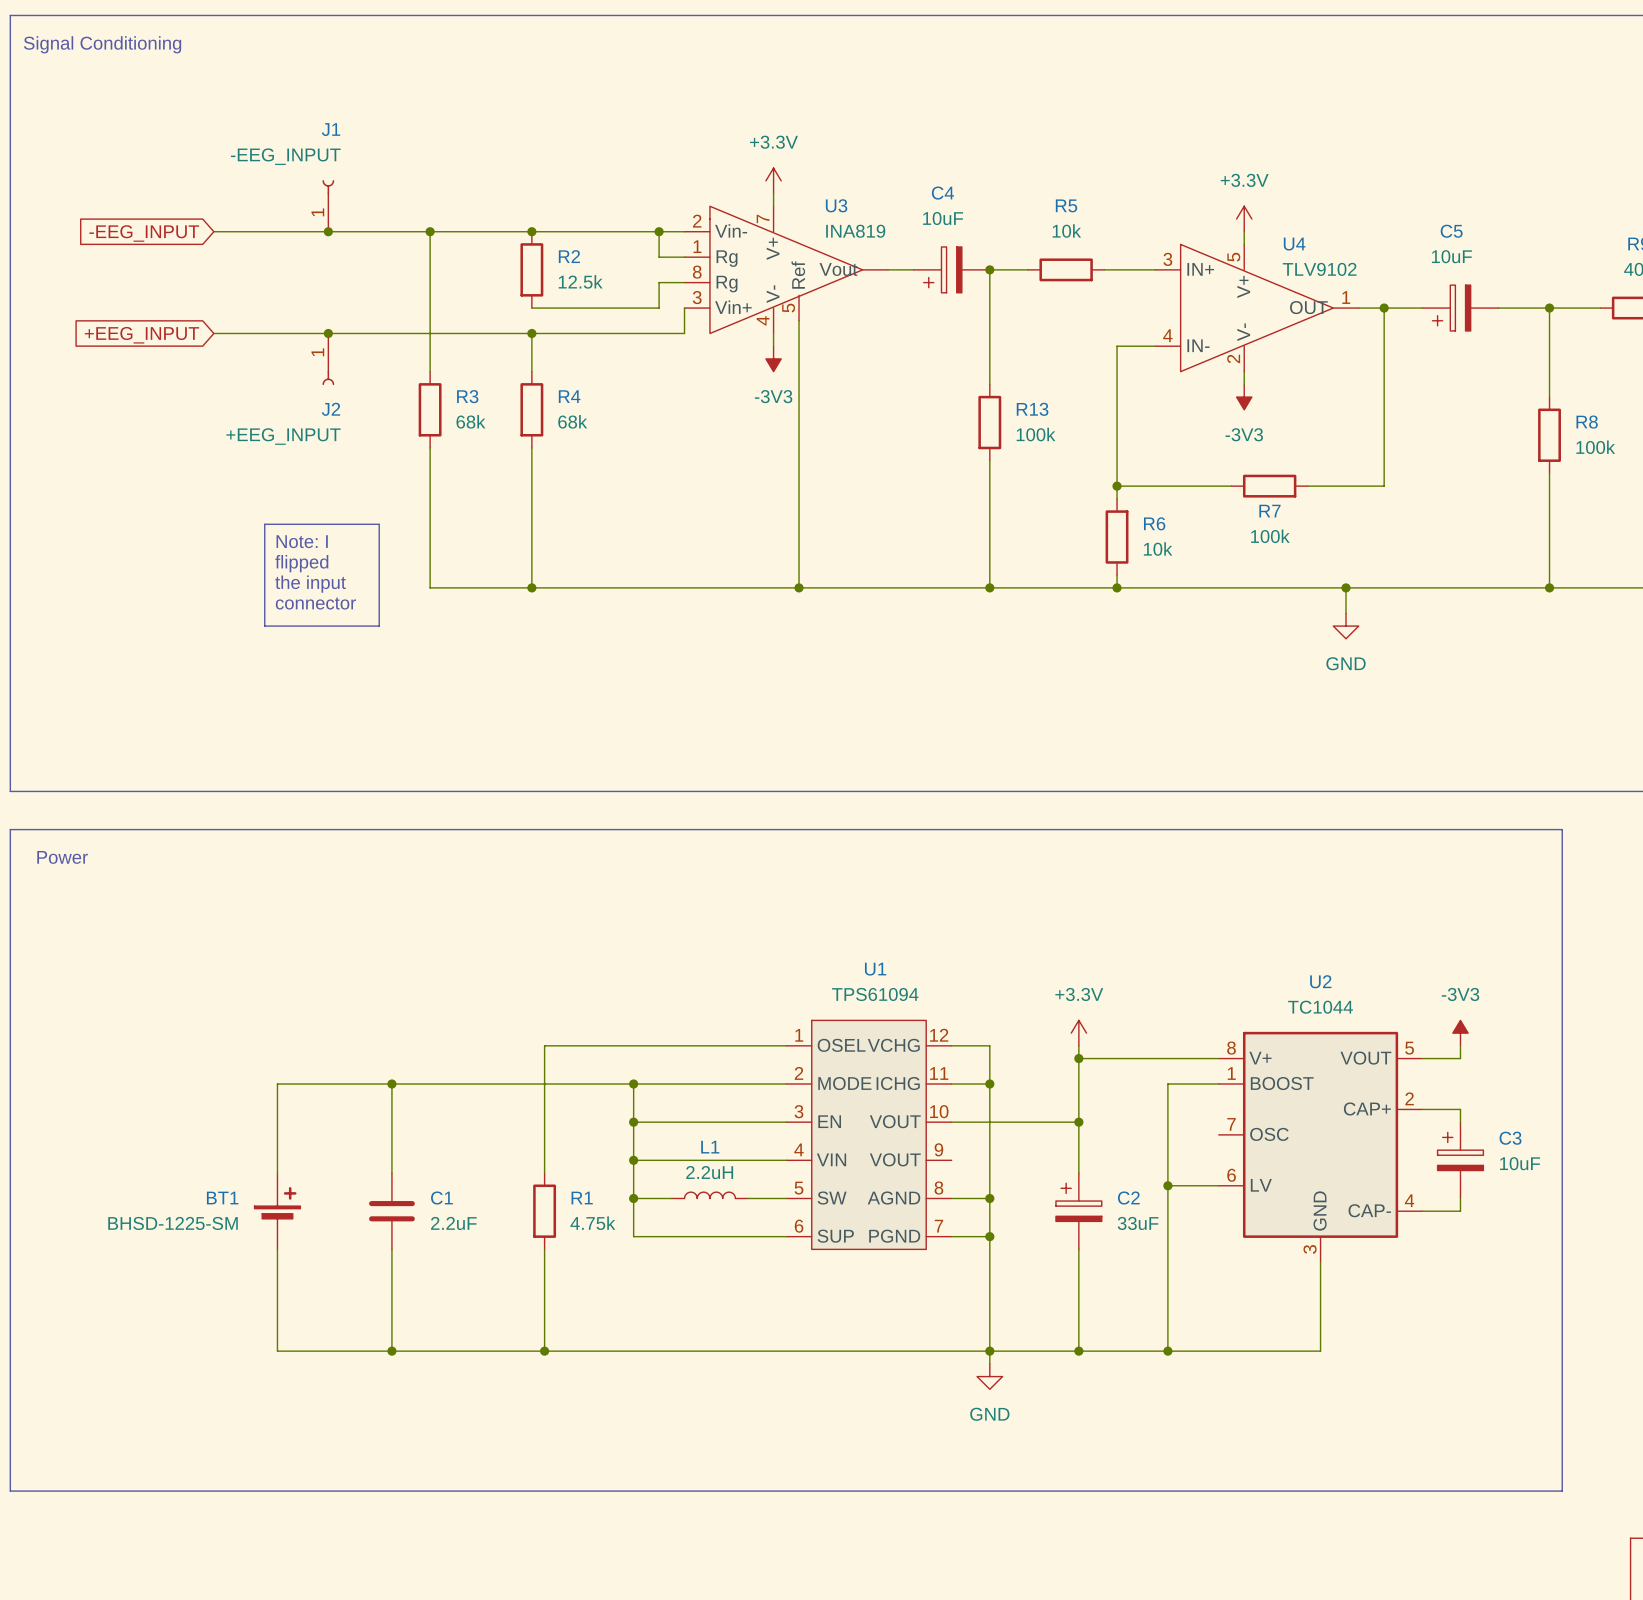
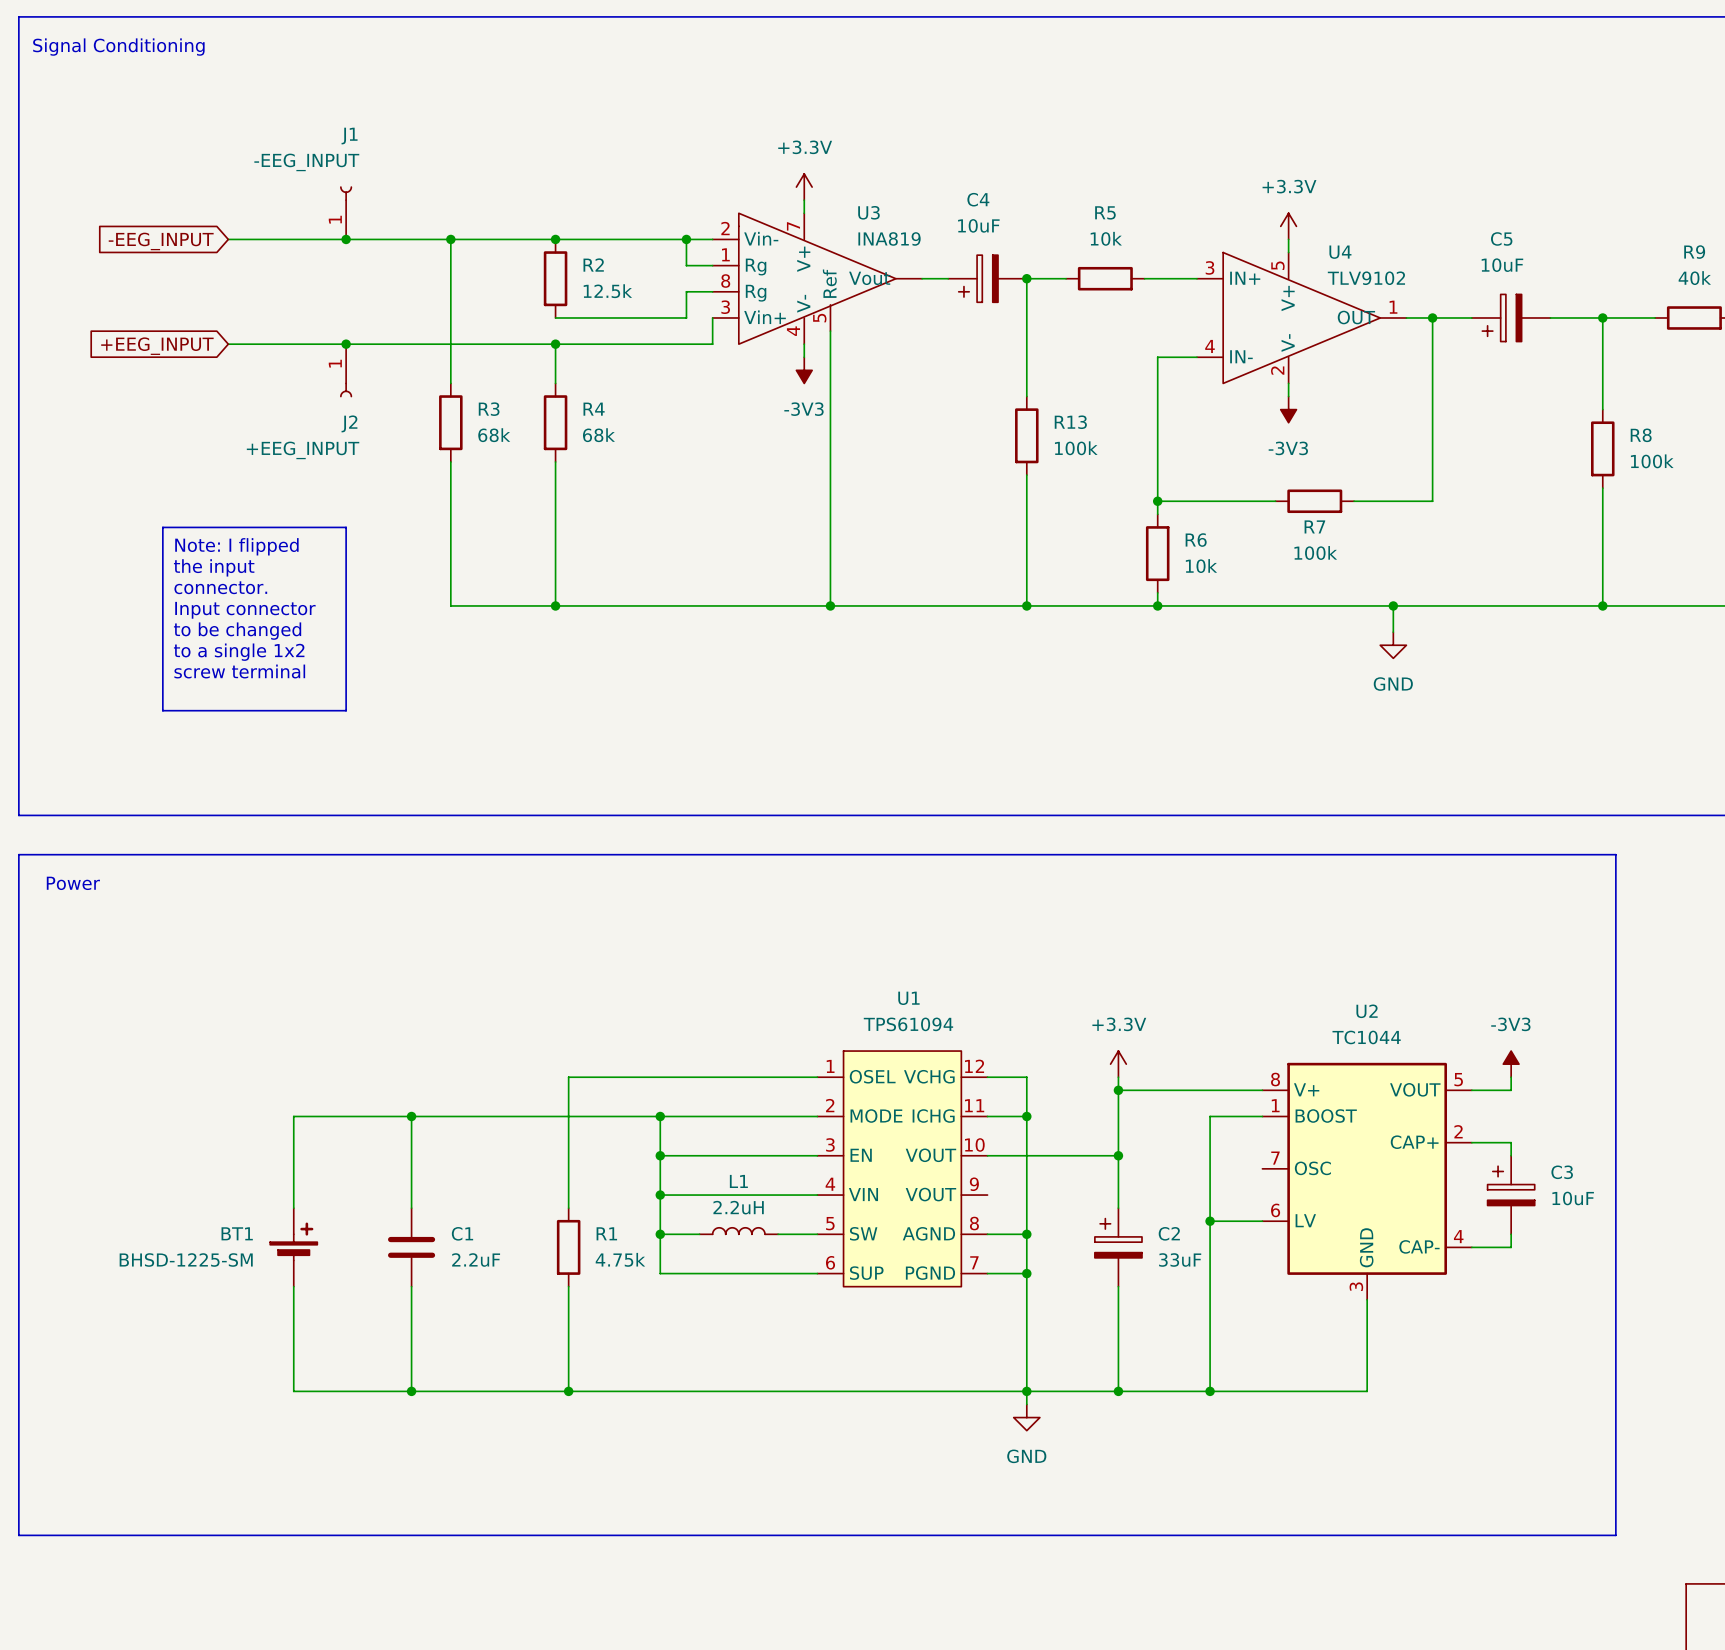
line: none -> (162, 527) (346, 527) (346, 710) (162, 710) (162, 527)
line: (264, 524) (379, 524) (379, 626) (264, 626) (264, 524) -> none
text: Note: I (302, 541) -> Note: I flipped (236, 546)
text: flipped (301, 563) -> none
text: none -> connector. (220, 587)
text position: the input (310, 584) -> the input (214, 567)
text: connector (315, 603) -> Input connector (245, 610)
text: none -> to be changed (237, 631)
text: none -> to a single 1x2 (239, 652)
text: none -> screw terminal (239, 671)

